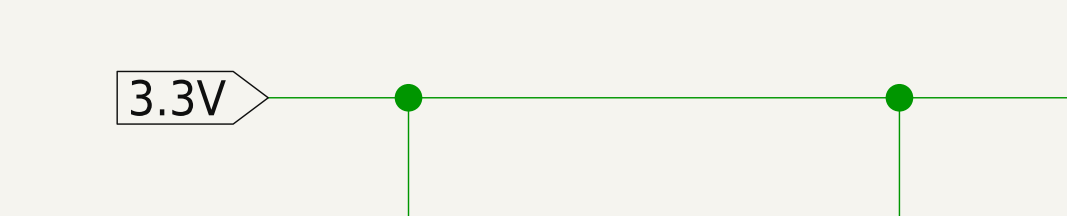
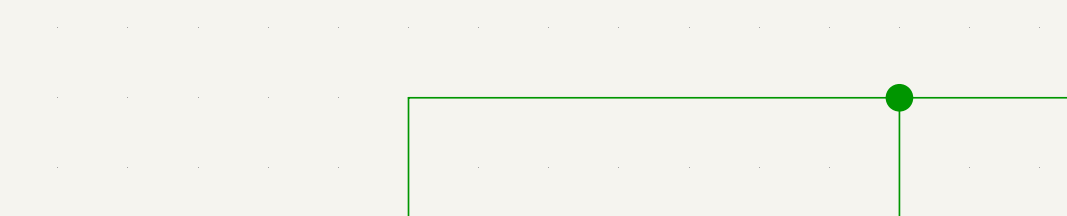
global label: 3.3V (178, 97) -> none
wire: (268, 97) (408, 97) -> none
junction: (408, 97) -> none

